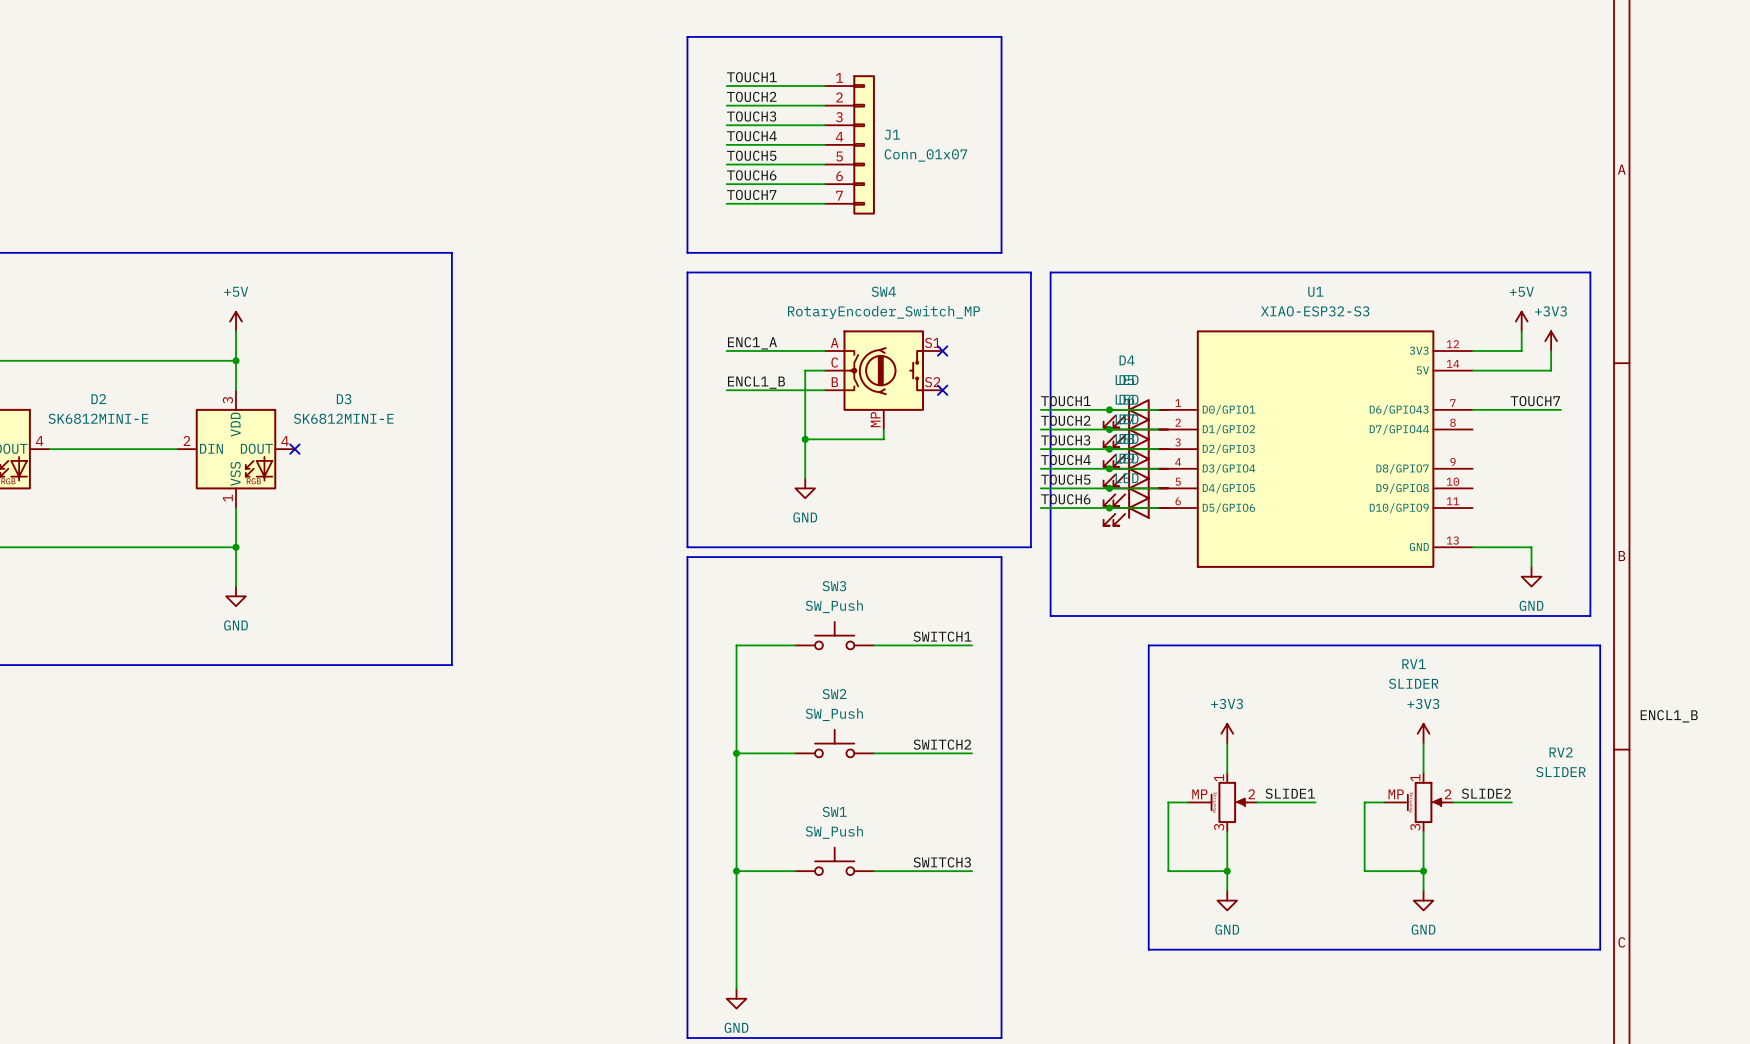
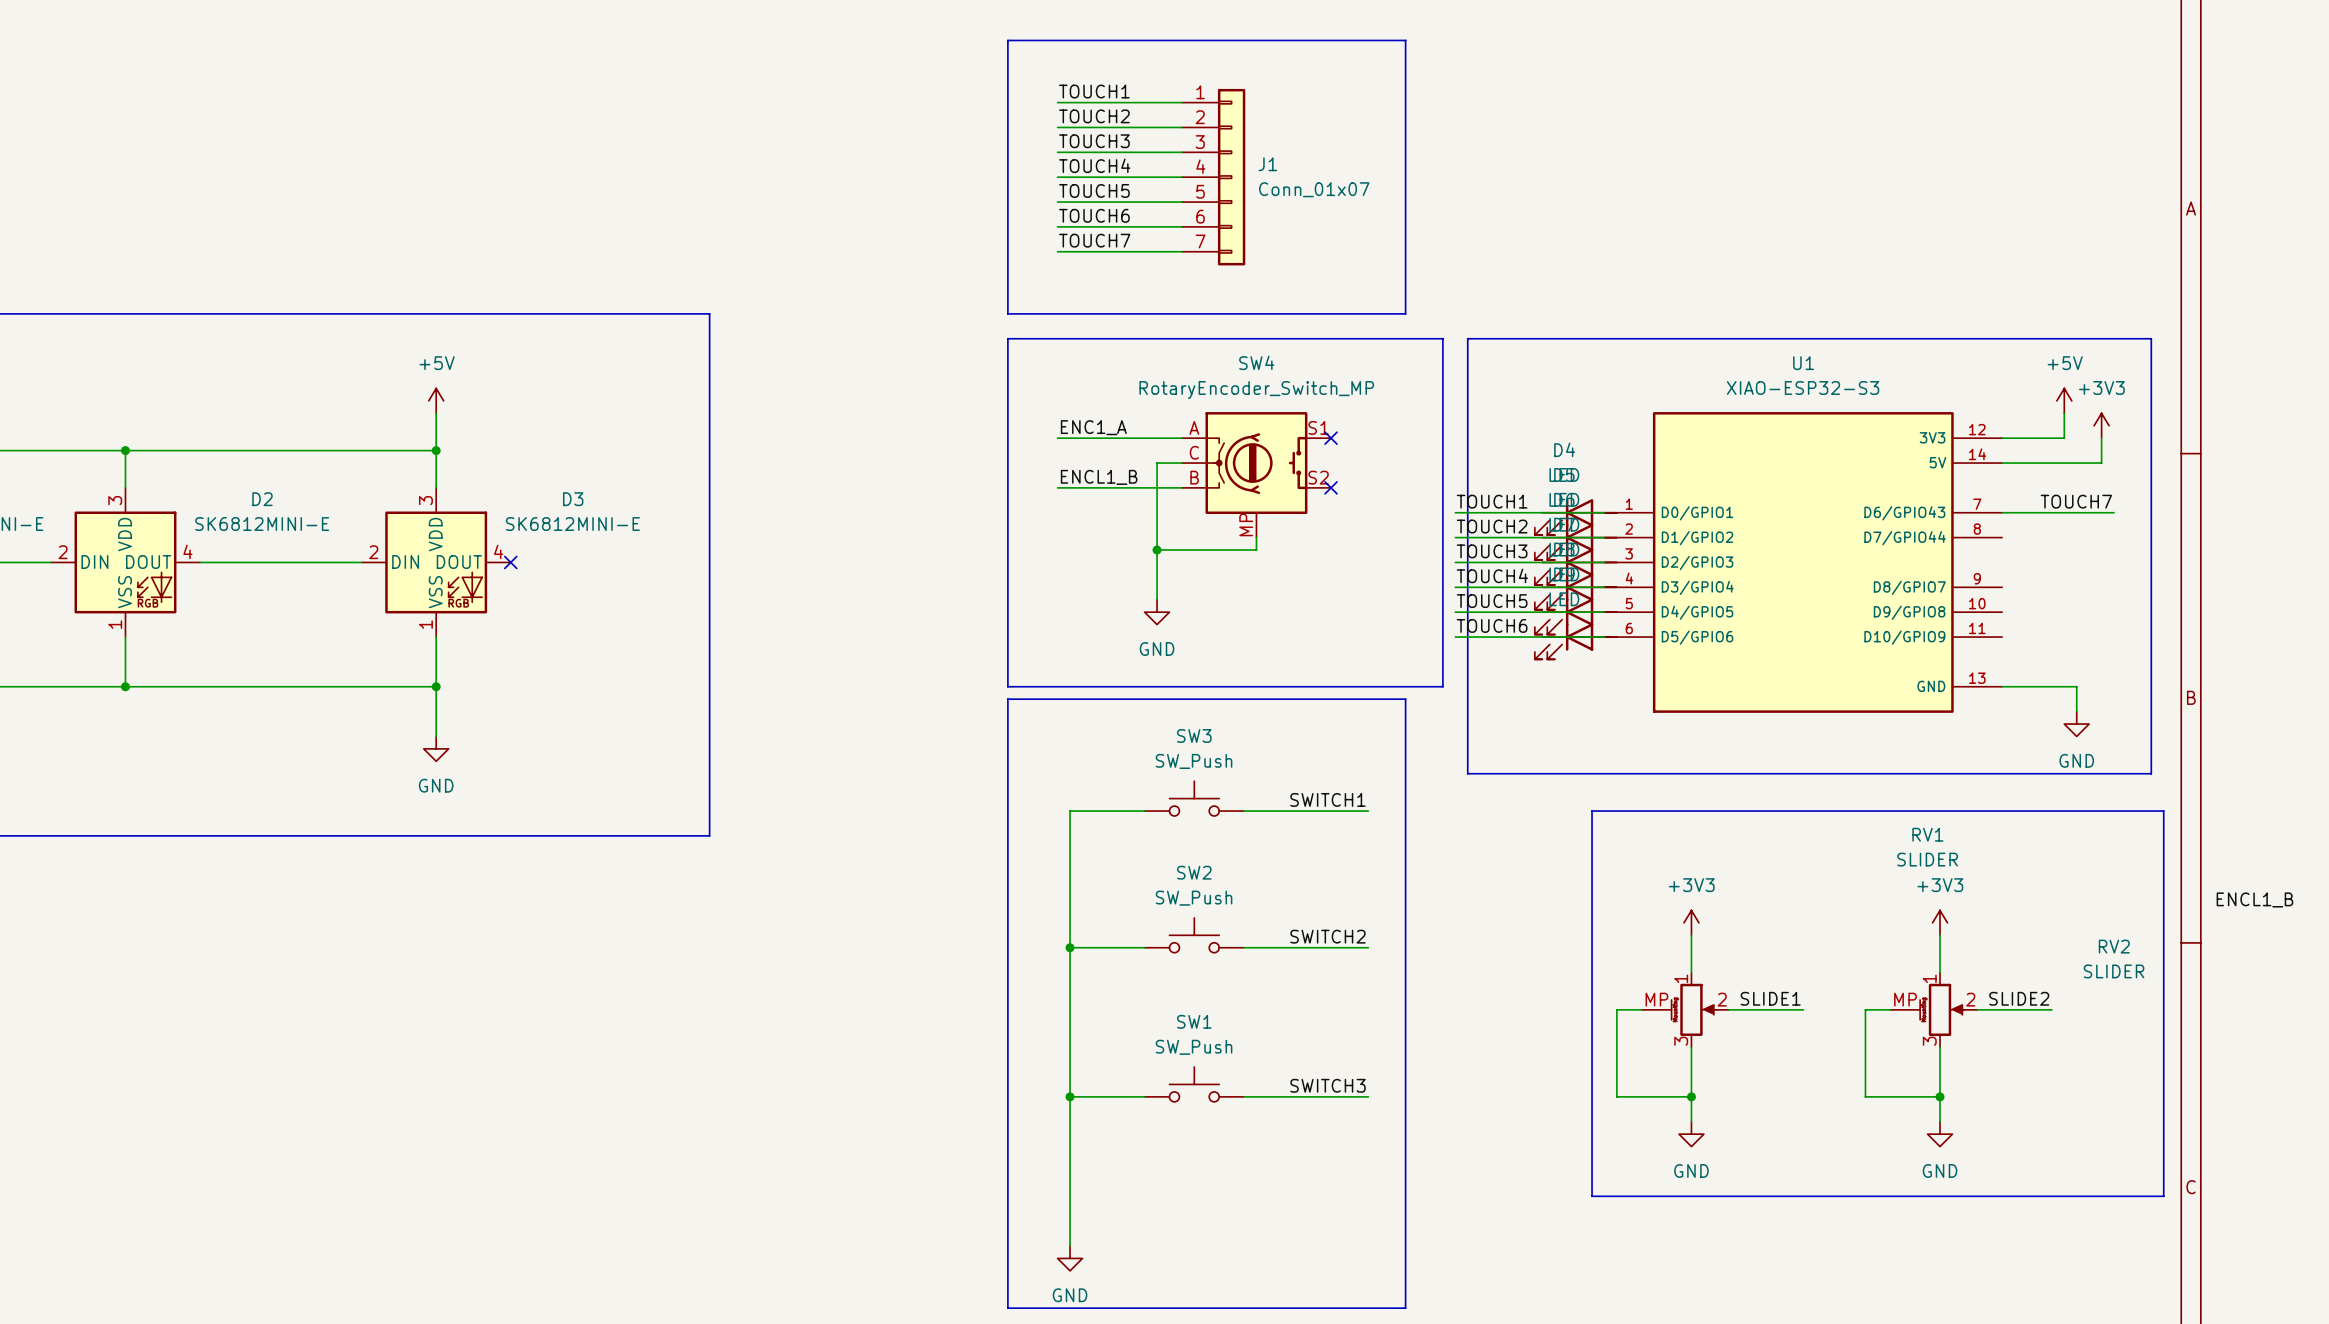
junction: (1109, 409) -> none
junction: (1109, 429) -> none
junction: (1109, 449) -> none
junction: (1109, 468) -> none
junction: (1109, 488) -> none
junction: (1109, 508) -> none

